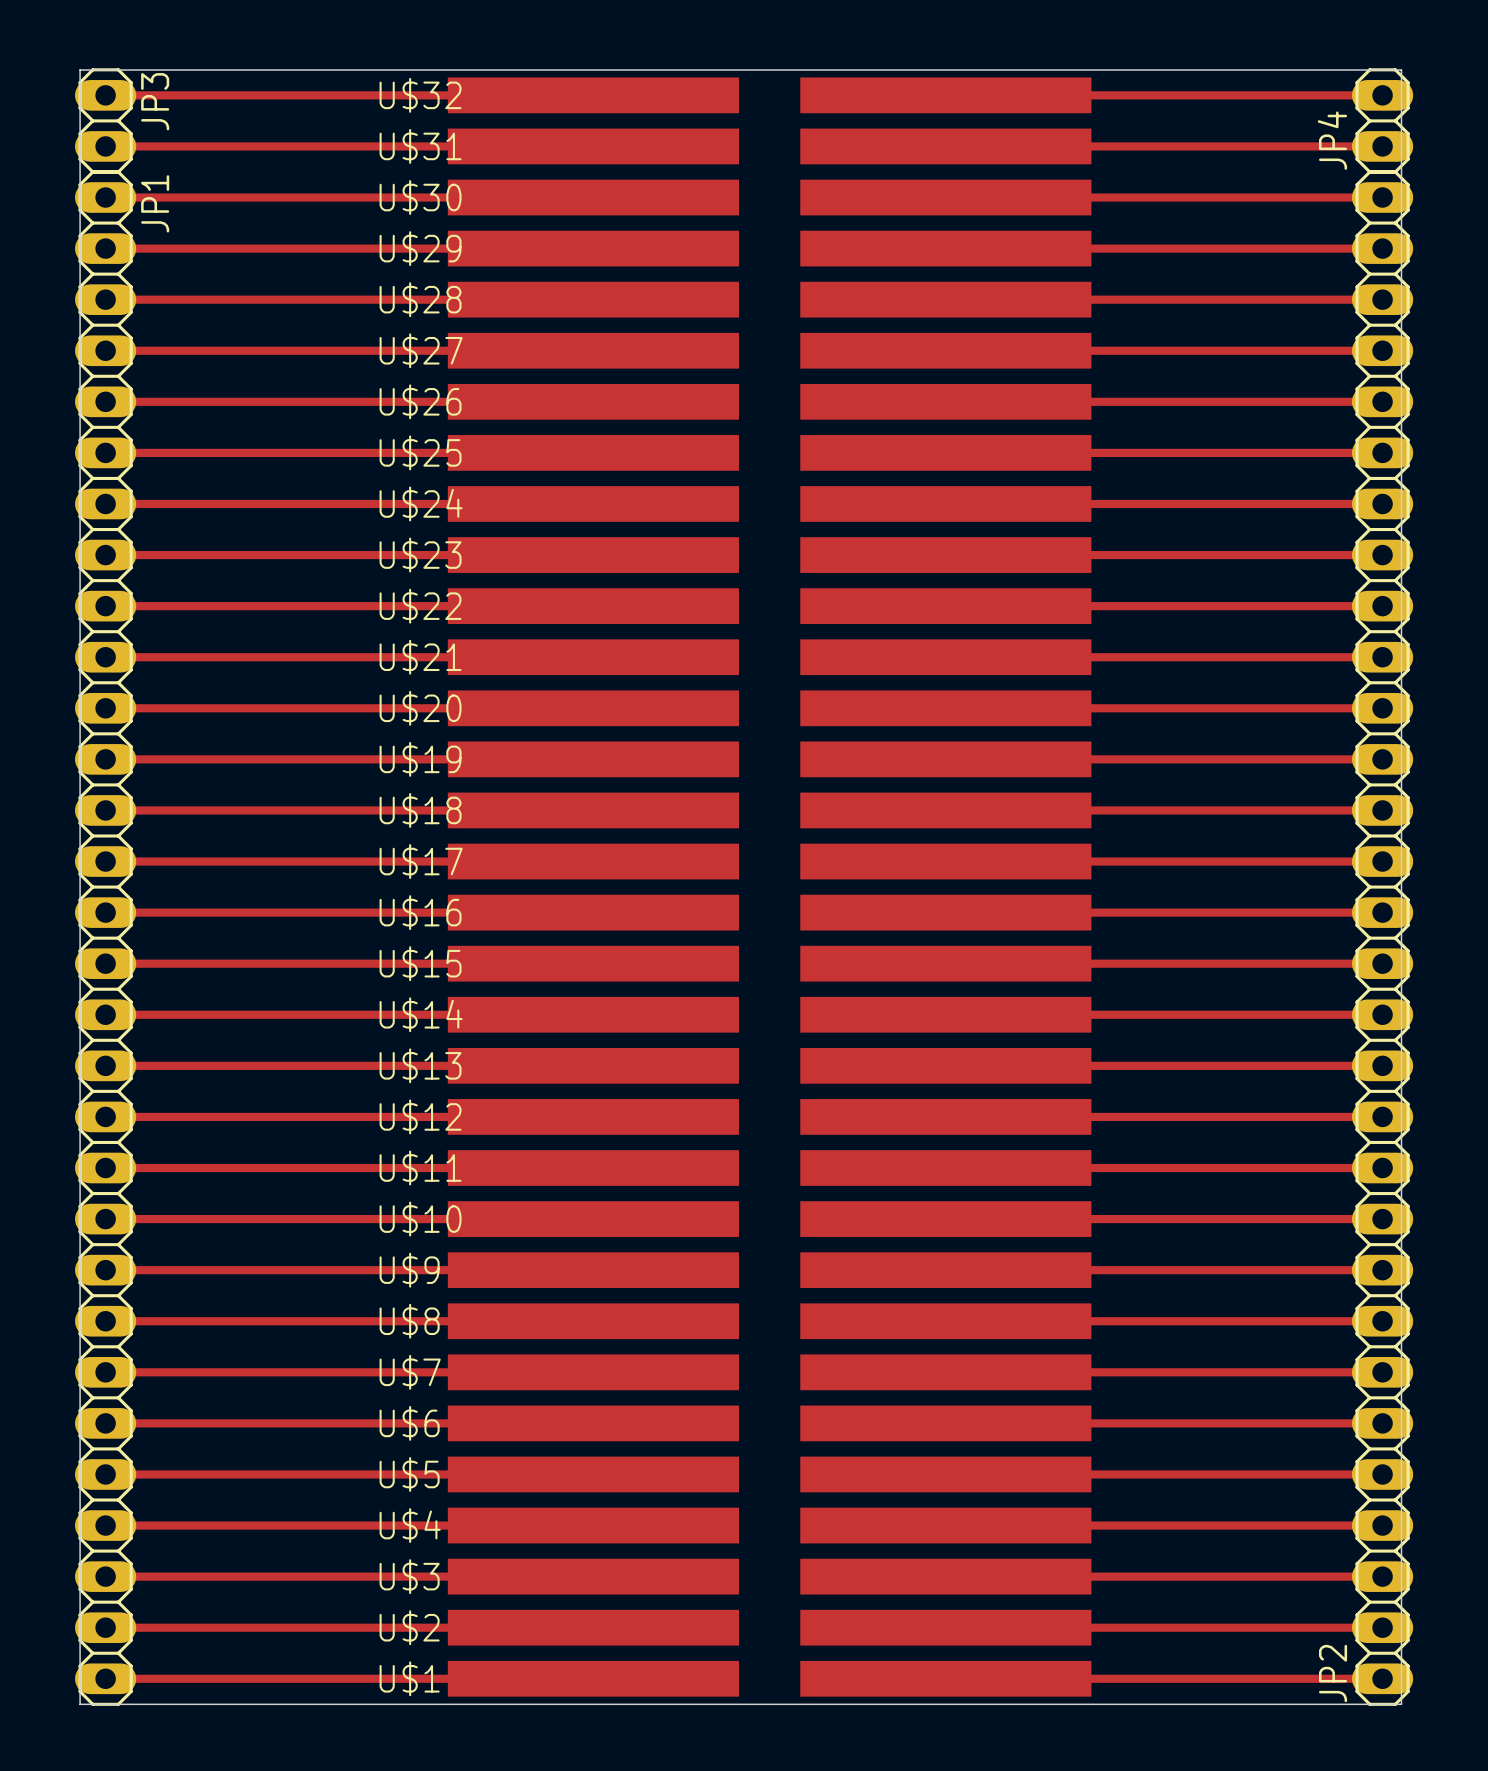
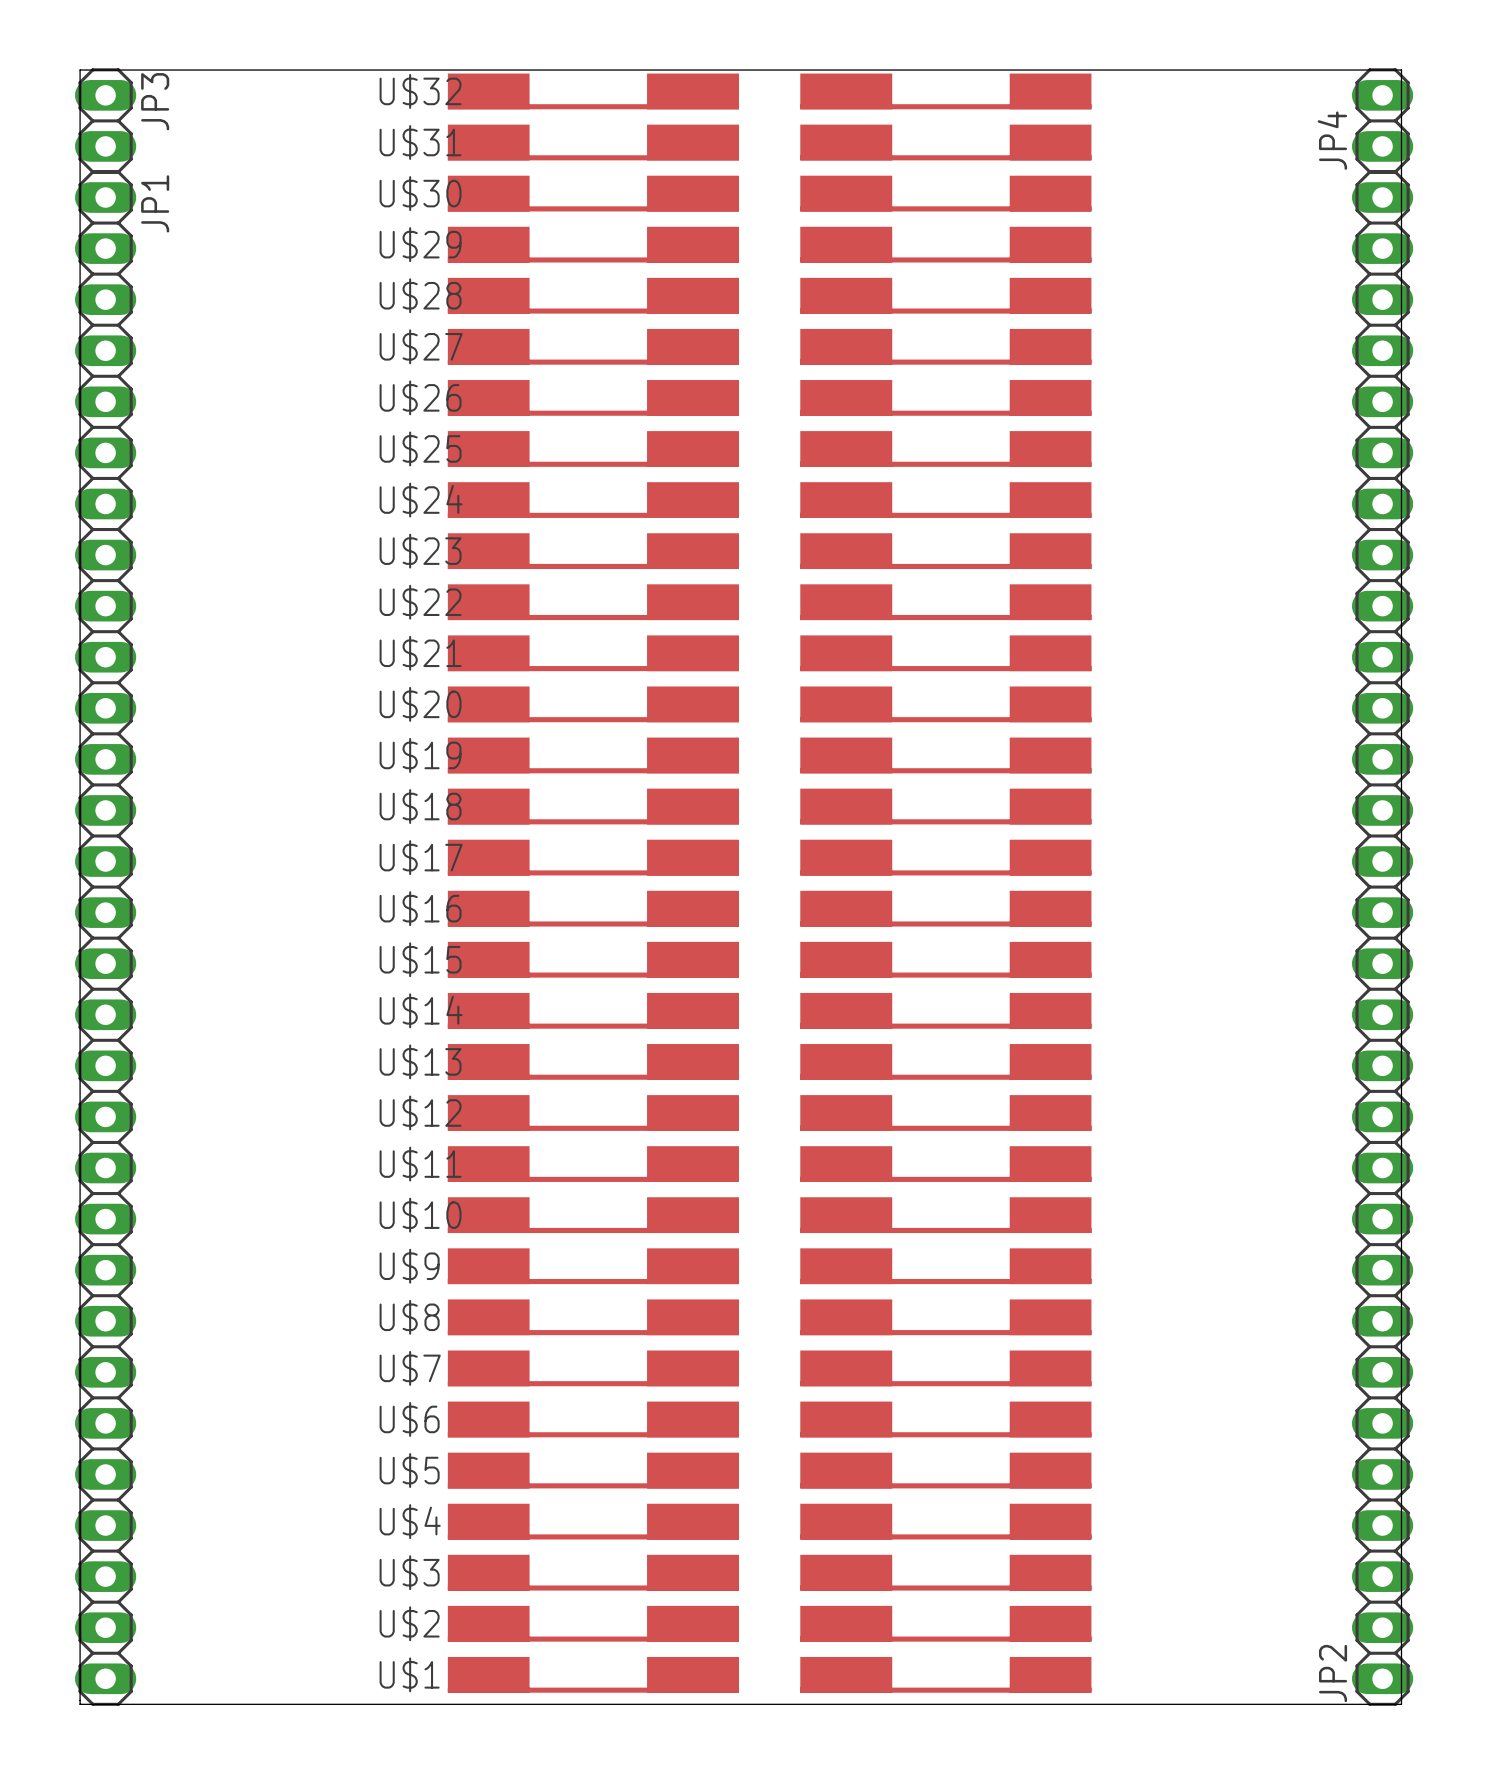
U$32 footprint: [447, 77, 1092, 114] -> [447, 73, 1092, 110]
track: (105, 95) (593, 95) -> none
track: (945, 95) (1382, 95) -> none
U$31 footprint: [447, 128, 1092, 165] -> [447, 124, 1092, 161]
track: (105, 146) (593, 146) -> none
track: (945, 146) (1382, 146) -> none
U$30 footprint: [447, 179, 1092, 216] -> [447, 175, 1092, 212]
track: (105, 197) (593, 197) -> none
track: (945, 197) (1382, 197) -> none
U$29 footprint: [447, 230, 1092, 267] -> [447, 226, 1092, 263]
track: (105, 248) (593, 248) -> none
track: (945, 248) (1382, 248) -> none
U$28 footprint: [447, 281, 1092, 318] -> [447, 277, 1092, 314]
track: (105, 299) (593, 299) -> none
track: (945, 299) (1382, 299) -> none
U$27 footprint: [447, 332, 1092, 369] -> [447, 328, 1092, 365]
track: (105, 350) (593, 350) -> none
track: (945, 350) (1382, 350) -> none
U$26 footprint: [447, 383, 1092, 420] -> [447, 380, 1092, 416]
track: (105, 401) (593, 401) -> none
track: (945, 401) (1382, 401) -> none
U$25 footprint: [447, 435, 1092, 471] -> [447, 431, 1092, 467]
track: (105, 452) (593, 452) -> none
track: (945, 452) (1382, 452) -> none
U$24 footprint: [447, 486, 1092, 522] -> [447, 482, 1092, 518]
track: (105, 503) (593, 503) -> none
track: (945, 503) (1382, 503) -> none
U$23 footprint: [447, 537, 1092, 573] -> [447, 533, 1092, 570]
track: (105, 555) (593, 555) -> none
track: (945, 555) (1382, 555) -> none
U$22 footprint: [447, 588, 1092, 625] -> [447, 584, 1092, 621]
track: (105, 606) (593, 606) -> none
track: (945, 606) (1382, 606) -> none
U$21 footprint: [447, 639, 1092, 676] -> [447, 635, 1092, 672]
track: (105, 657) (593, 657) -> none
track: (945, 657) (1382, 657) -> none
U$20 footprint: [447, 690, 1092, 727] -> [447, 686, 1092, 723]
track: (105, 708) (593, 708) -> none
track: (945, 708) (1382, 708) -> none
U$19 footprint: [447, 741, 1092, 778] -> [447, 737, 1092, 774]
track: (105, 759) (593, 759) -> none
track: (945, 759) (1382, 759) -> none
U$18 footprint: [447, 792, 1092, 829] -> [447, 788, 1092, 825]
track: (105, 810) (593, 810) -> none
track: (945, 810) (1382, 810) -> none
U$17 footprint: [447, 843, 1092, 880] -> [447, 839, 1092, 876]
track: (105, 861) (593, 861) -> none
track: (945, 861) (1382, 861) -> none
U$16 footprint: [447, 894, 1092, 931] -> [447, 890, 1092, 927]
track: (105, 912) (593, 912) -> none
track: (945, 912) (1382, 912) -> none
U$15 footprint: [447, 945, 1092, 982] -> [447, 941, 1092, 978]
track: (105, 963) (593, 963) -> none
track: (945, 963) (1382, 963) -> none
U$14 footprint: [447, 996, 1092, 1033] -> [447, 992, 1092, 1029]
track: (105, 1014) (593, 1014) -> none
track: (945, 1014) (1382, 1014) -> none
U$13 footprint: [447, 1047, 1092, 1084] -> [447, 1044, 1092, 1080]
track: (105, 1065) (593, 1065) -> none
track: (945, 1065) (1382, 1065) -> none
U$12 footprint: [447, 1099, 1092, 1135] -> [447, 1095, 1092, 1131]
track: (105, 1116) (593, 1116) -> none
track: (945, 1116) (1382, 1116) -> none
U$11 footprint: [447, 1150, 1092, 1186] -> [447, 1146, 1092, 1182]
track: (105, 1168) (593, 1168) -> none
track: (945, 1168) (1382, 1168) -> none
U$10 footprint: [447, 1201, 1092, 1237] -> [447, 1197, 1092, 1234]
track: (105, 1219) (593, 1219) -> none
track: (945, 1219) (1382, 1219) -> none
U$9 footprint: [447, 1252, 1092, 1289] -> [447, 1248, 1092, 1285]
track: (105, 1270) (593, 1270) -> none
track: (945, 1270) (1382, 1270) -> none
U$8 footprint: [447, 1303, 1092, 1340] -> [447, 1299, 1092, 1336]
track: (105, 1321) (593, 1321) -> none
track: (945, 1321) (1382, 1321) -> none
U$7 footprint: [447, 1354, 1092, 1391] -> [447, 1350, 1092, 1387]
track: (105, 1372) (593, 1372) -> none
track: (945, 1372) (1382, 1372) -> none
U$6 footprint: [447, 1405, 1092, 1442] -> [447, 1401, 1092, 1438]
track: (105, 1423) (593, 1423) -> none
track: (945, 1423) (1382, 1423) -> none
U$5 footprint: [447, 1456, 1092, 1493] -> [447, 1452, 1092, 1489]
track: (105, 1474) (593, 1474) -> none
track: (945, 1474) (1382, 1474) -> none
U$4 footprint: [447, 1507, 1092, 1544] -> [447, 1503, 1092, 1540]
track: (105, 1525) (593, 1525) -> none
track: (945, 1525) (1382, 1525) -> none
U$3 footprint: [447, 1558, 1092, 1595] -> [447, 1554, 1092, 1591]
track: (105, 1576) (593, 1576) -> none
track: (945, 1576) (1382, 1576) -> none
U$2 footprint: [447, 1609, 1092, 1646] -> [447, 1605, 1092, 1642]
track: (105, 1627) (593, 1627) -> none
track: (945, 1627) (1382, 1627) -> none
U$1 footprint: [447, 1660, 1092, 1697] -> [447, 1656, 1092, 1693]
track: (105, 1678) (593, 1678) -> none
track: (945, 1678) (1382, 1678) -> none

